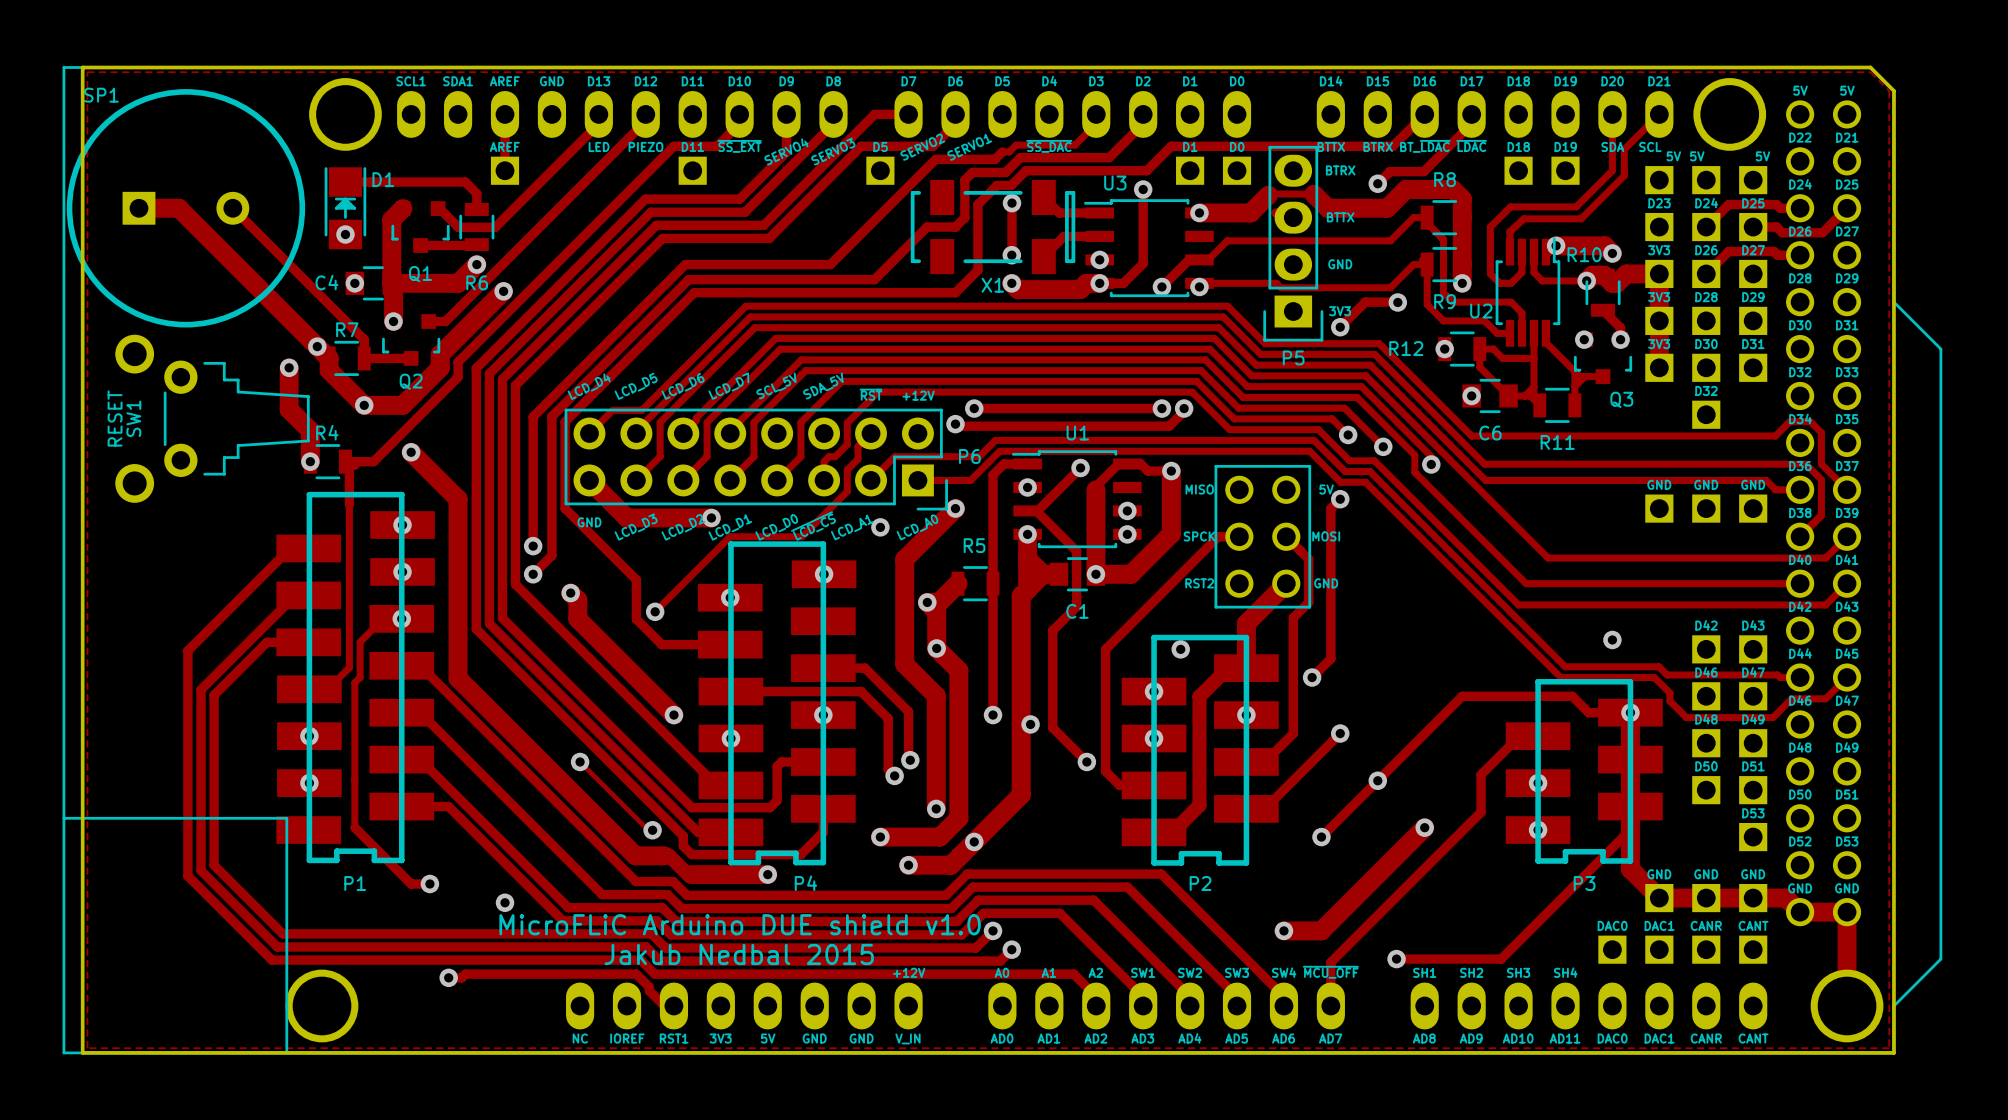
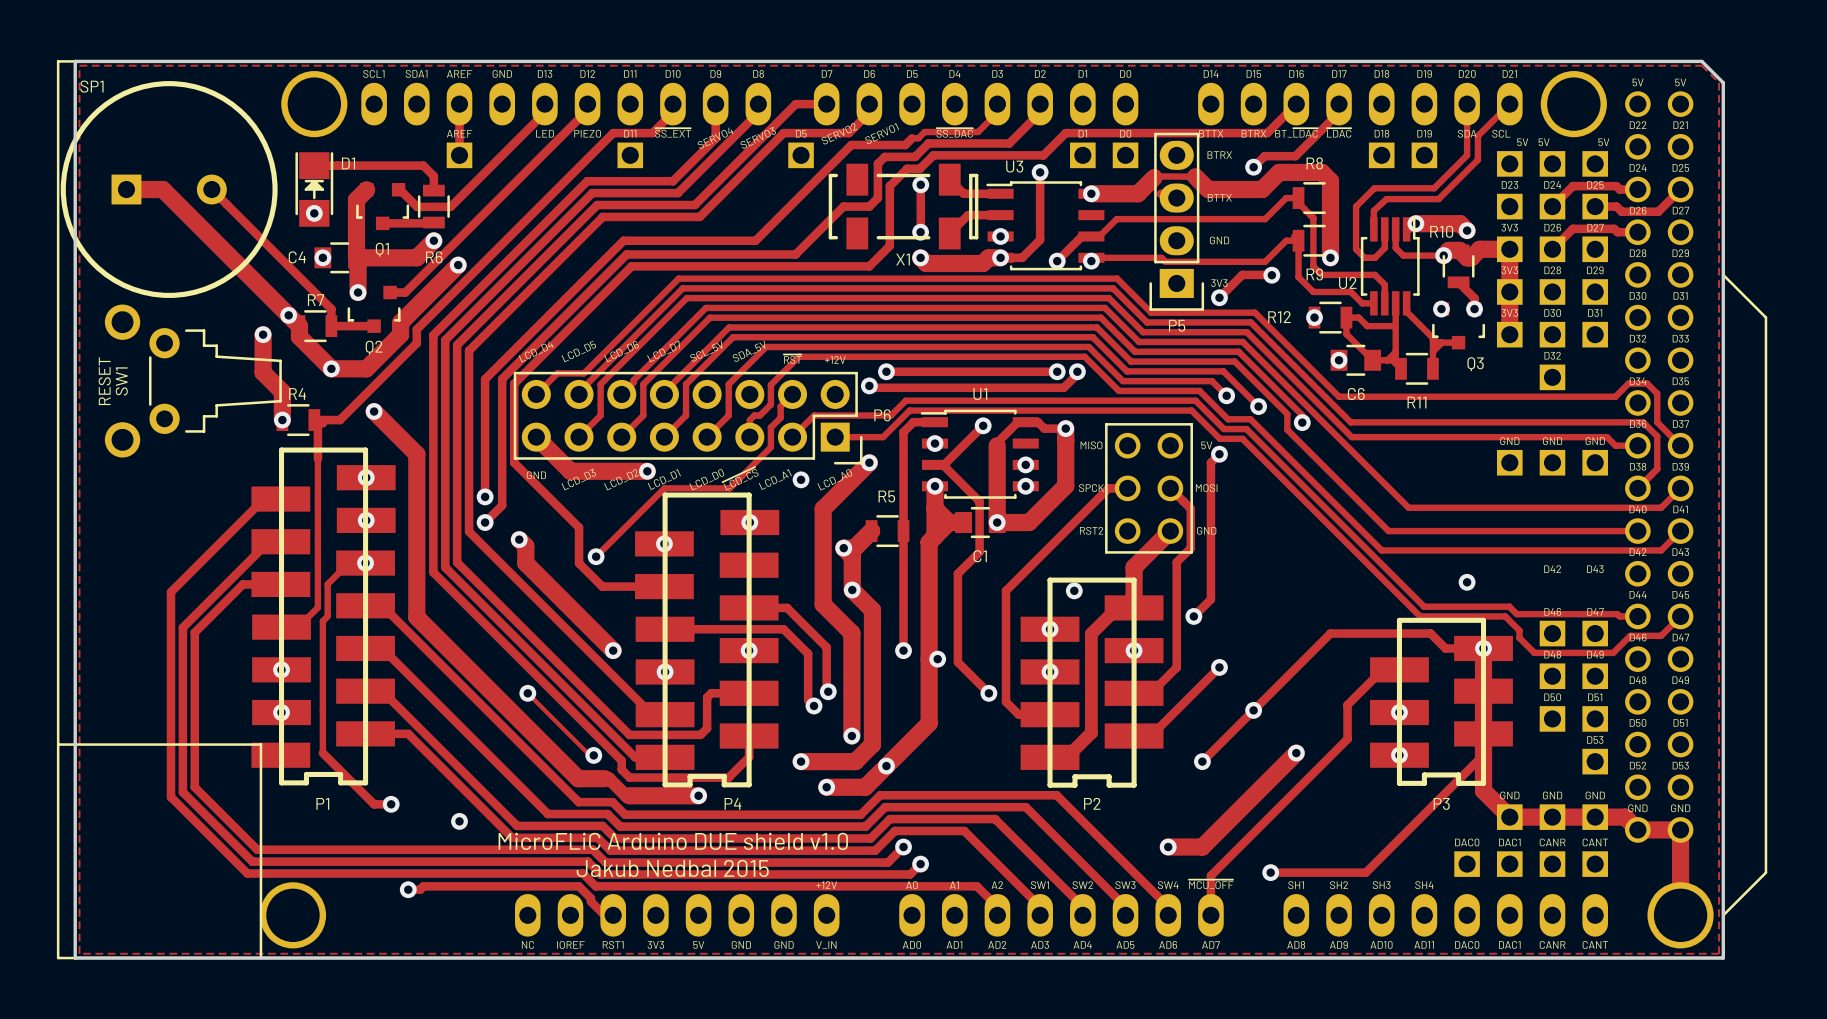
part: (1706, 649) -> none
part: (1753, 649) -> none

